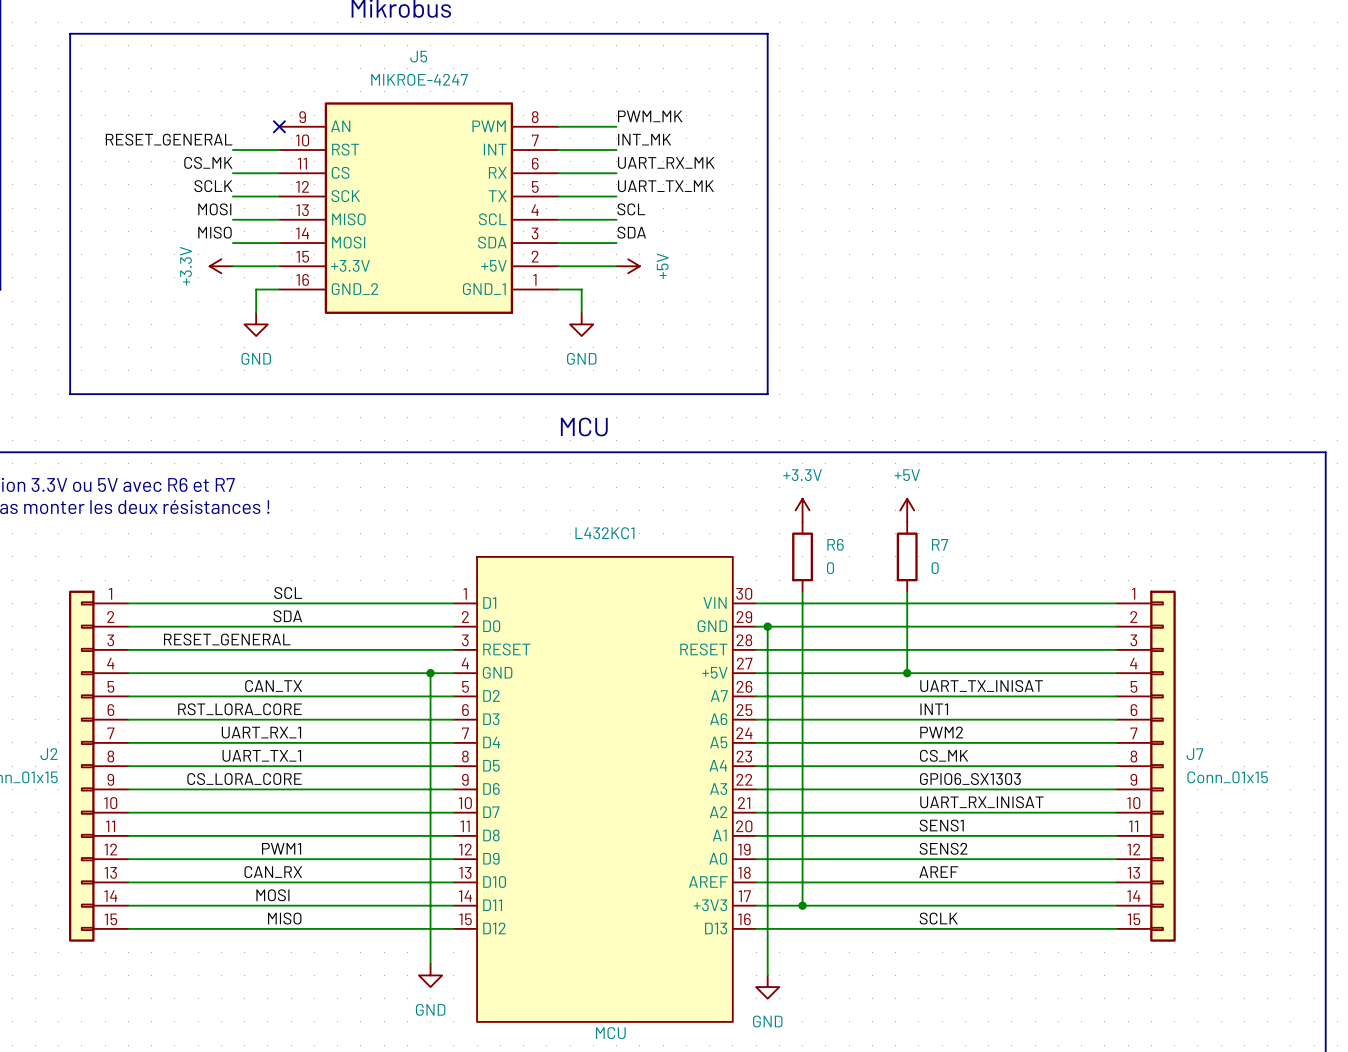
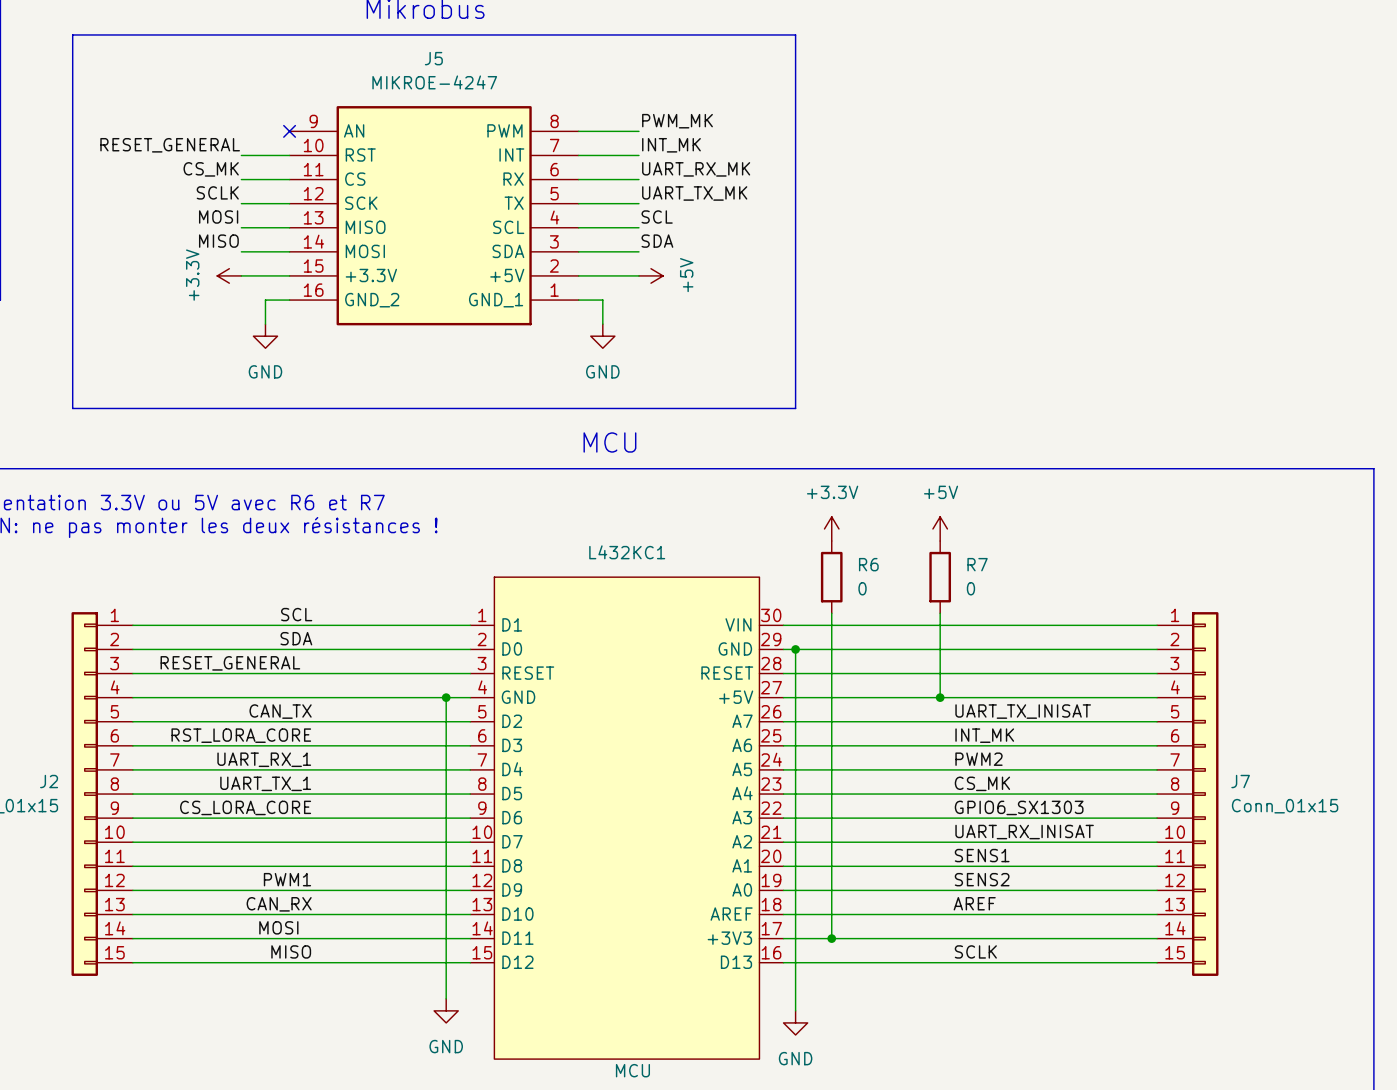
label: INT1 (934, 709) -> INT_MK (984, 735)

